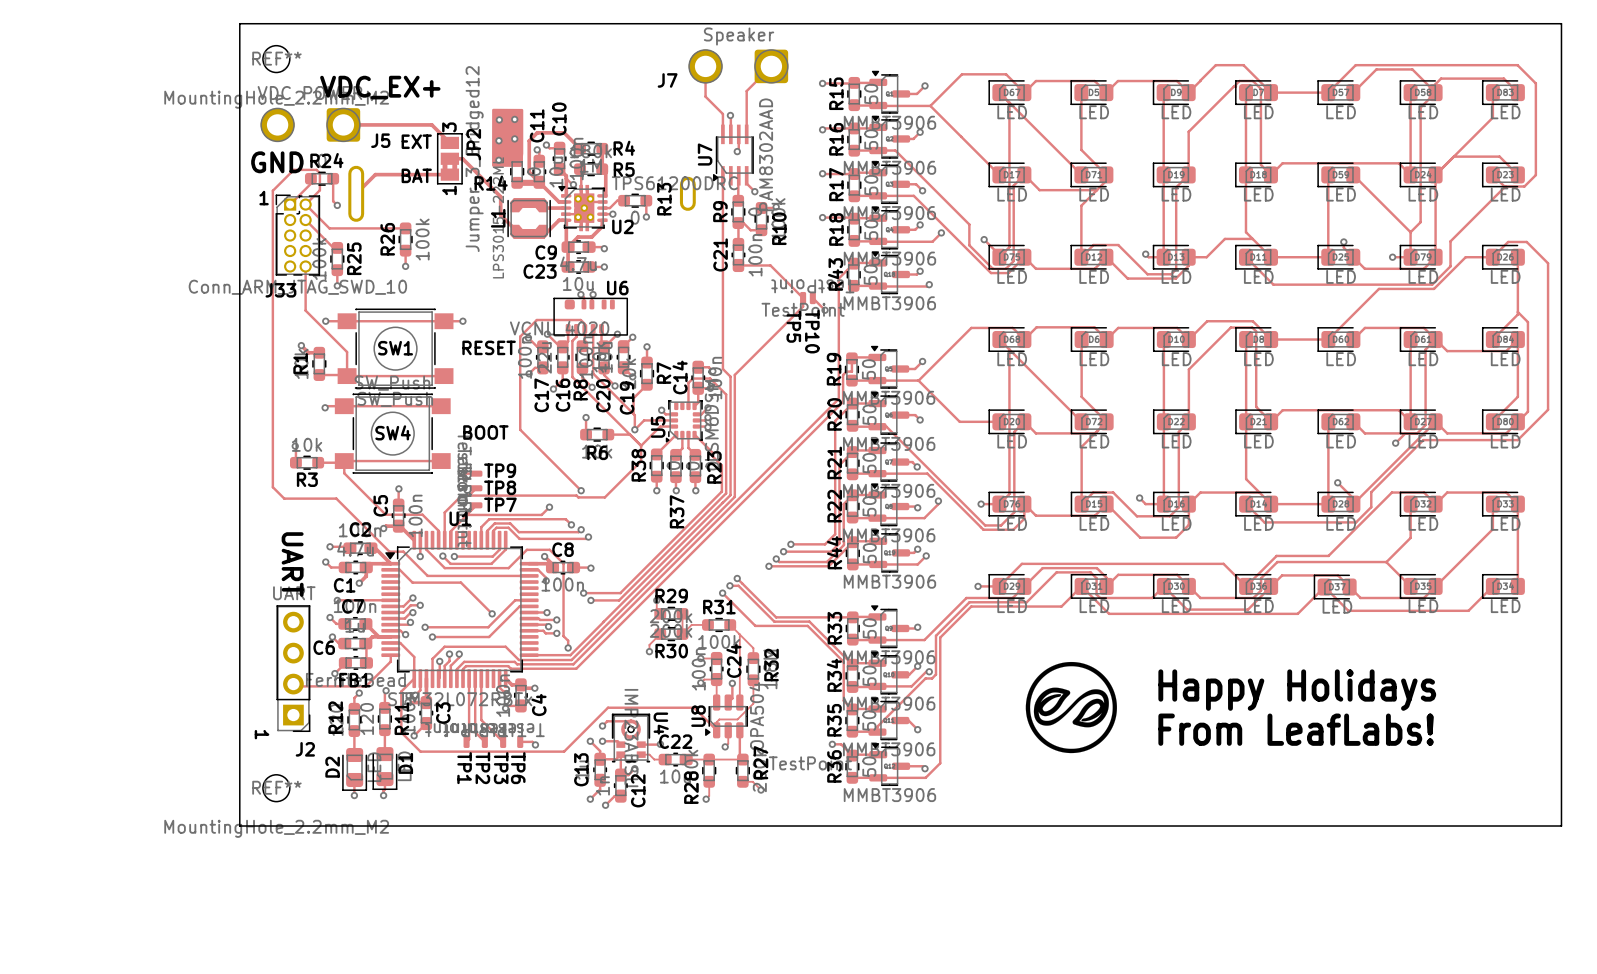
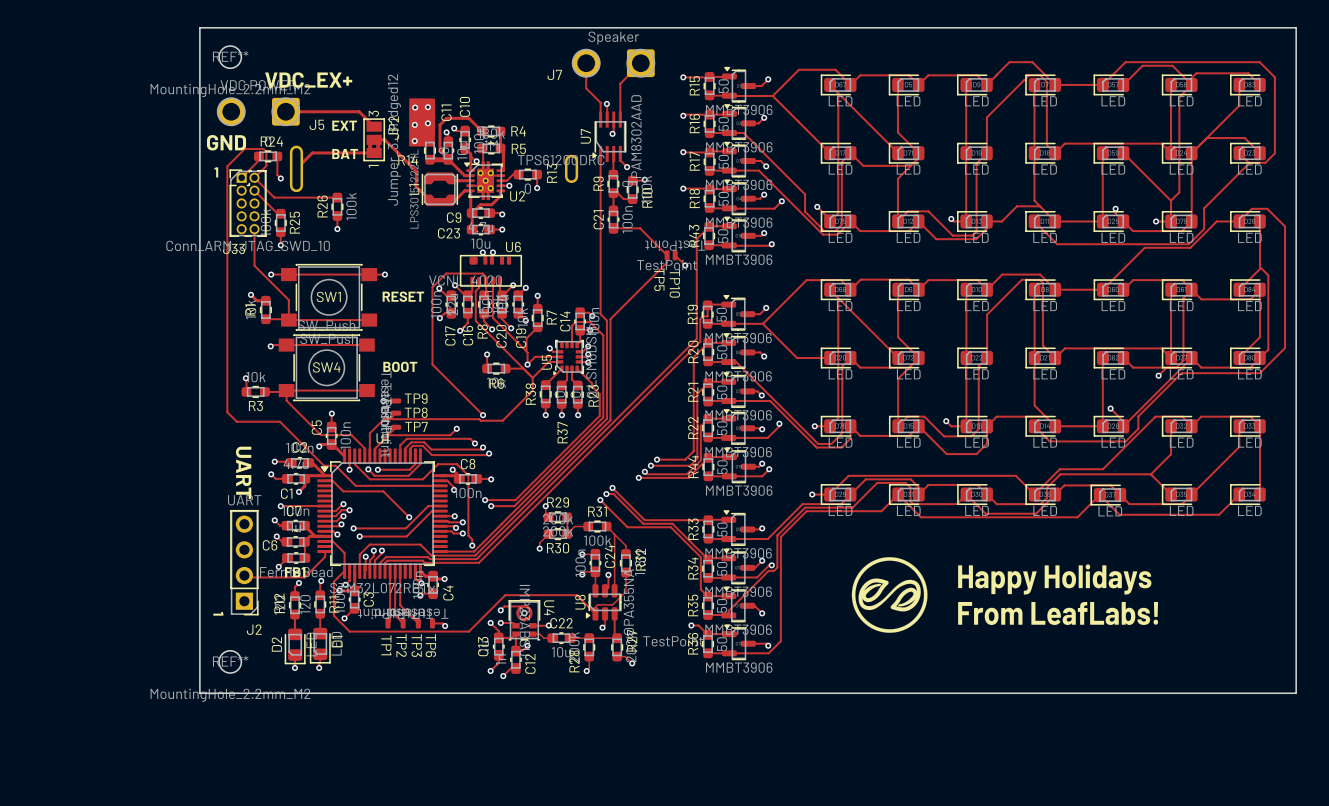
U8 value: OPA504 (756, 716) -> OPA355NA (628, 602)

